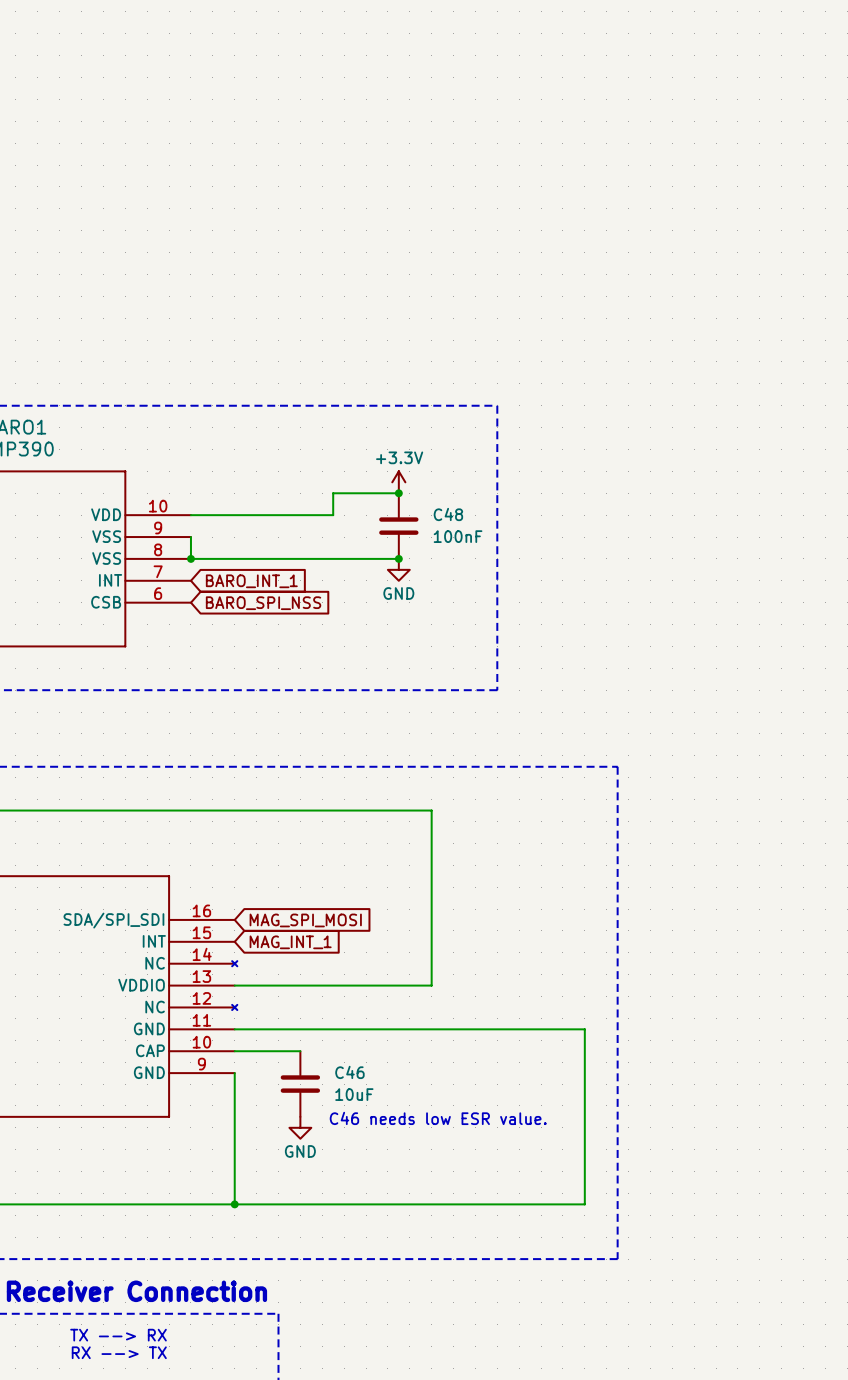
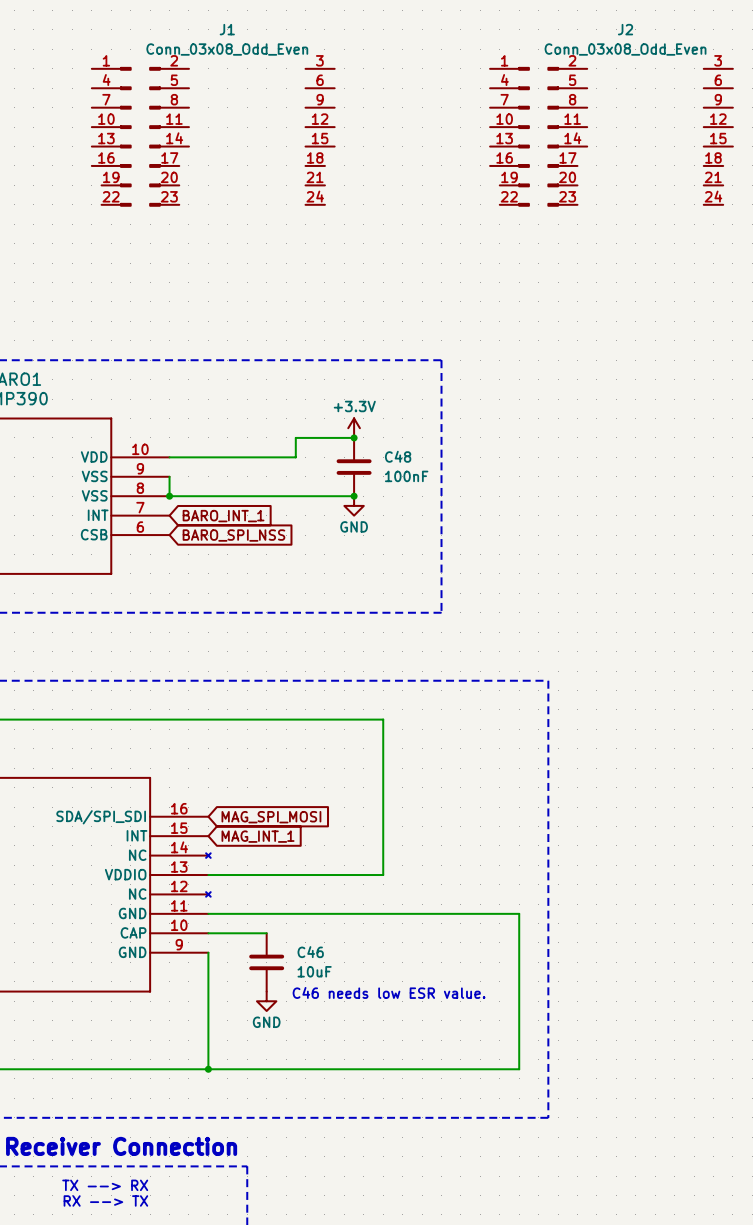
J1: none -> Conn_03x08_Odd_Even (213, 136)
J2: none -> Conn_03x08_Odd_Even (611, 136)

